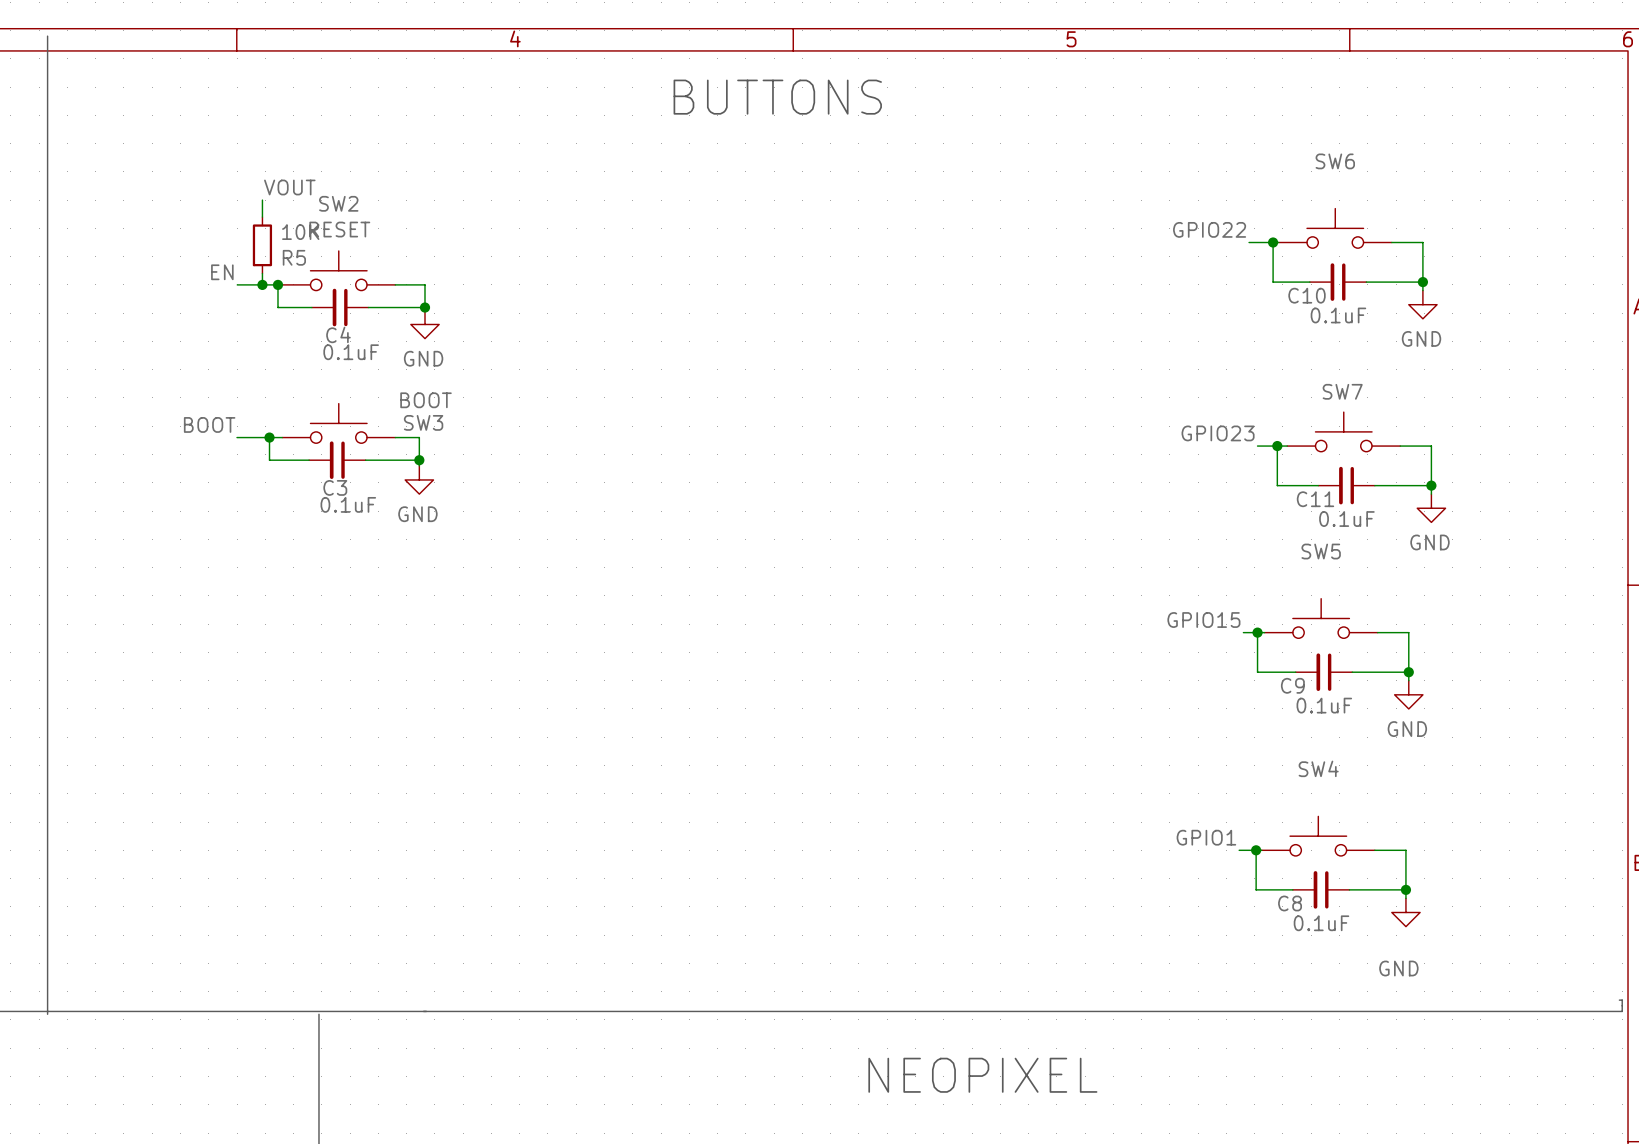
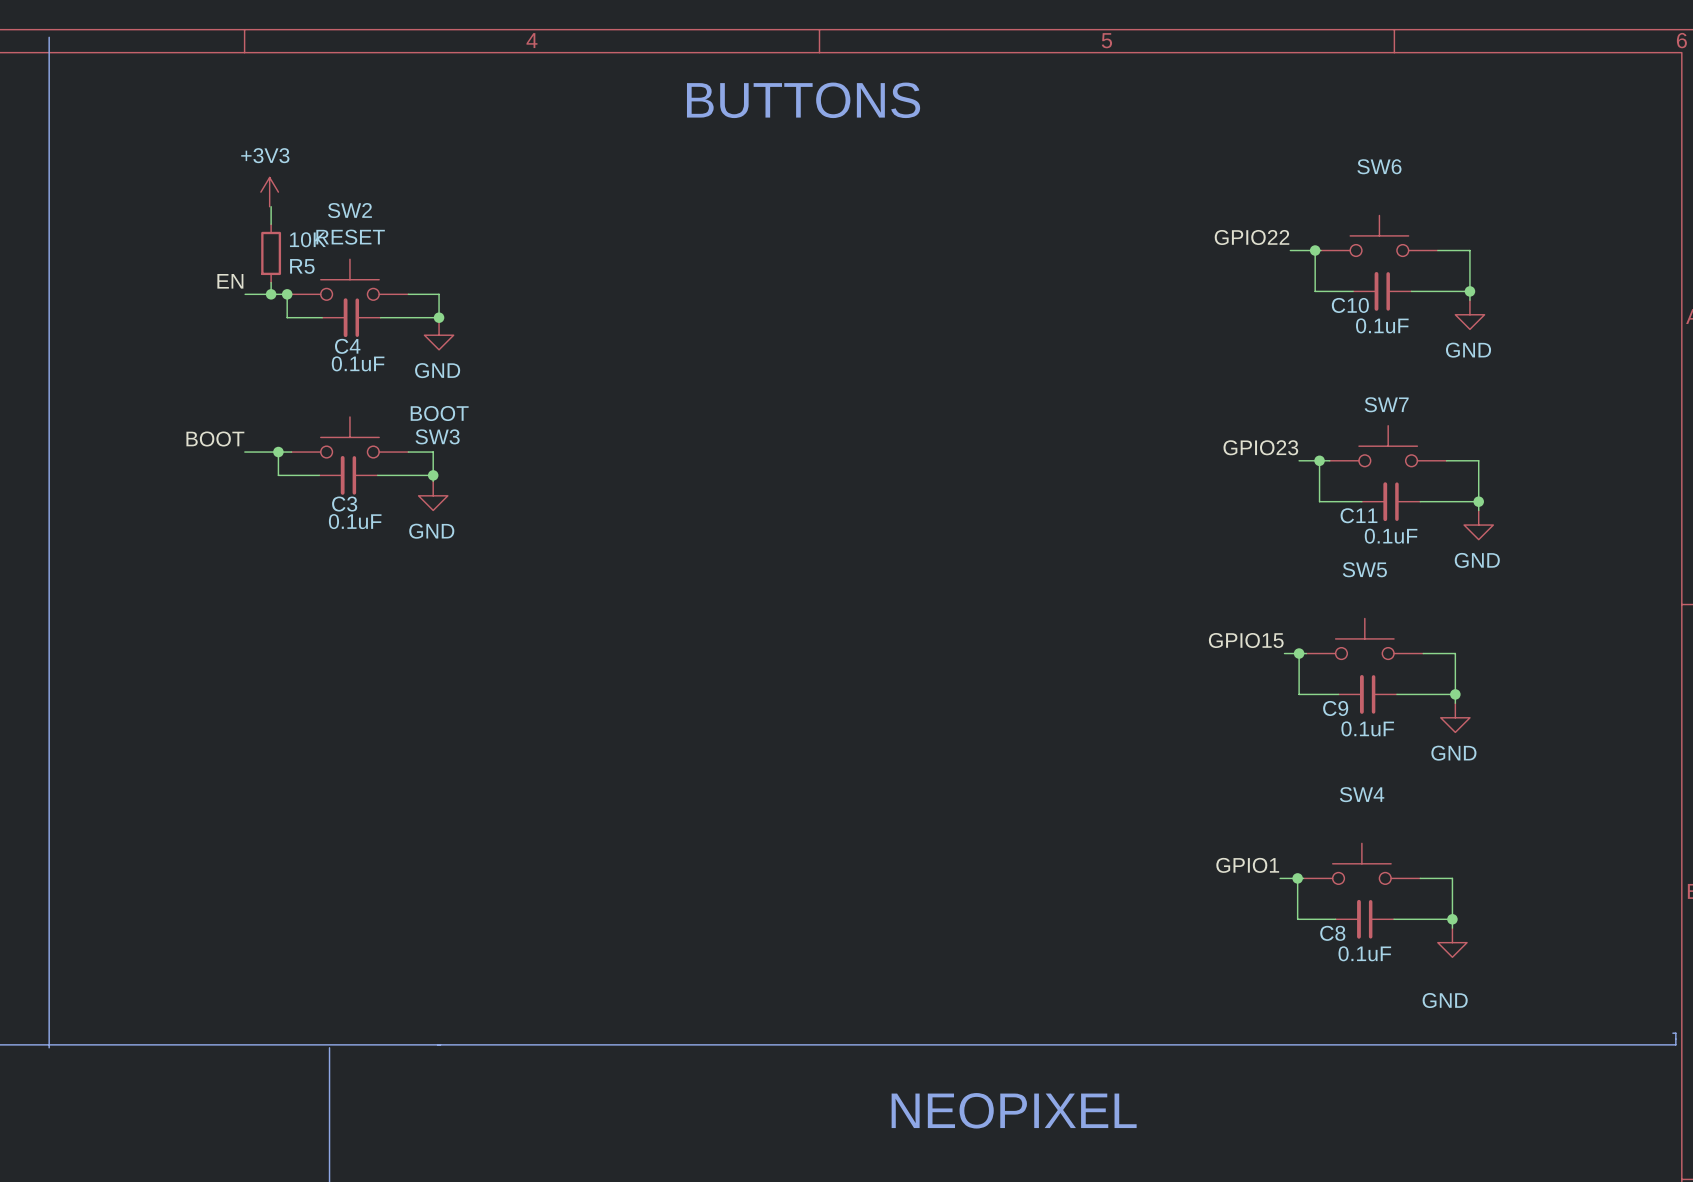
power symbol: none -> +3V3 (269, 192)
label: VOUT (289, 187) -> none

